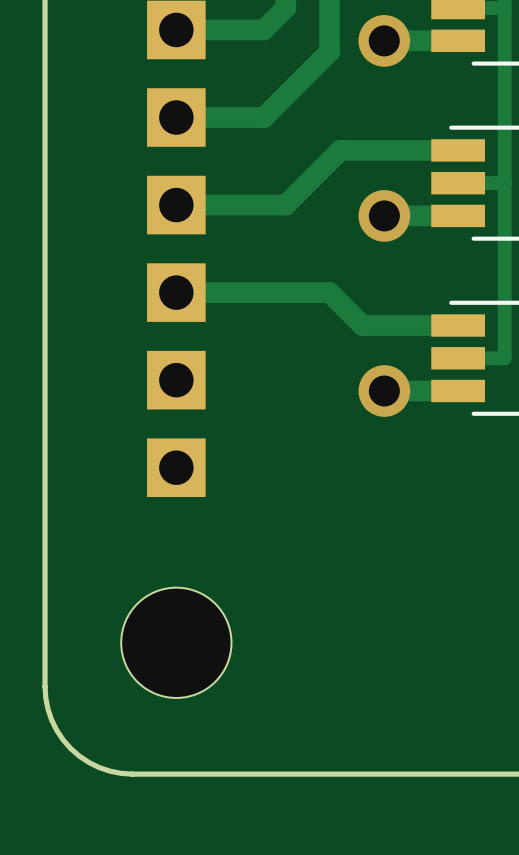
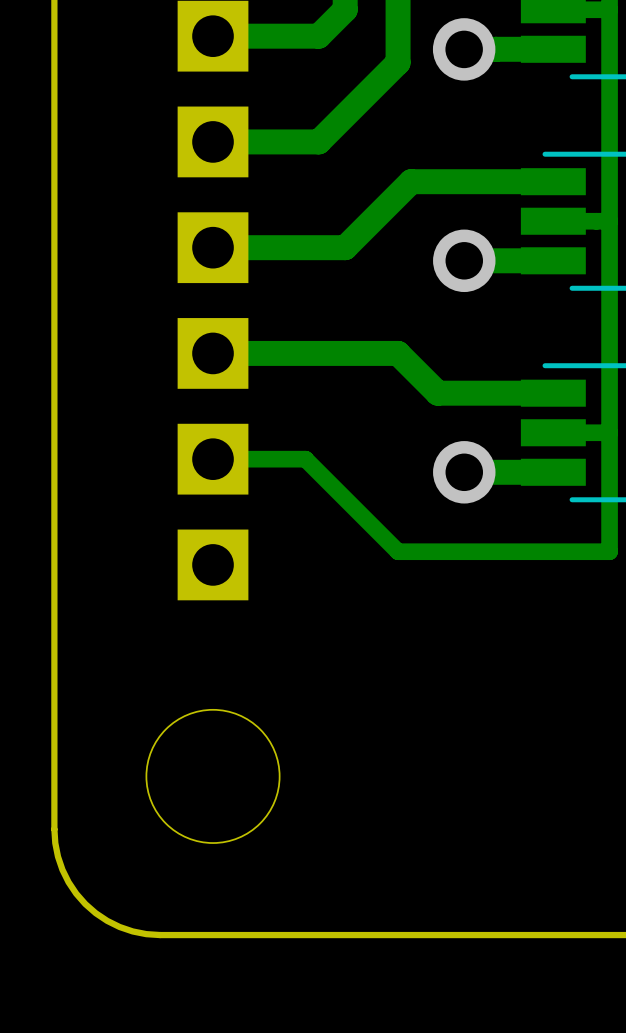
track: none -> (609, 432) (609, 551) (398, 551) (305, 459) (213, 459)

